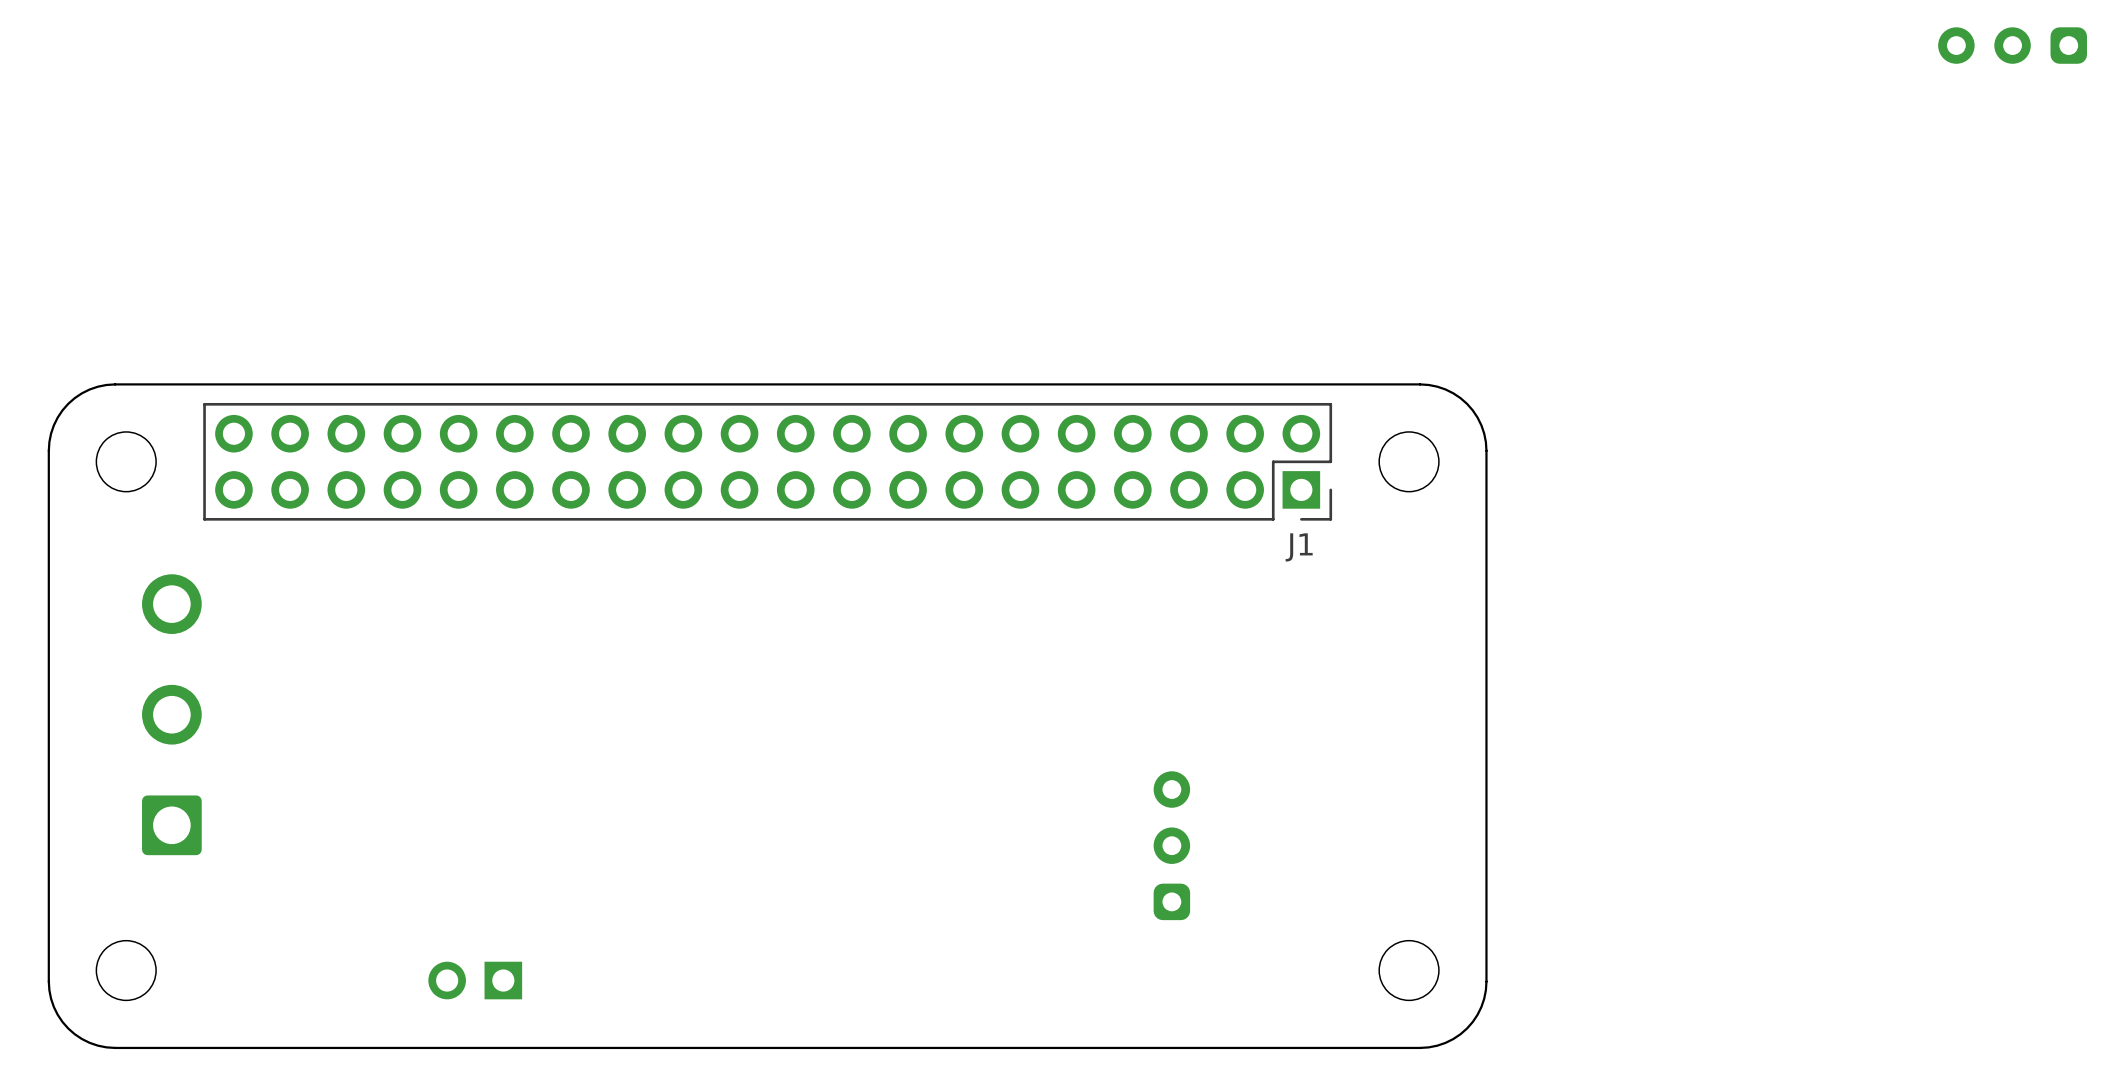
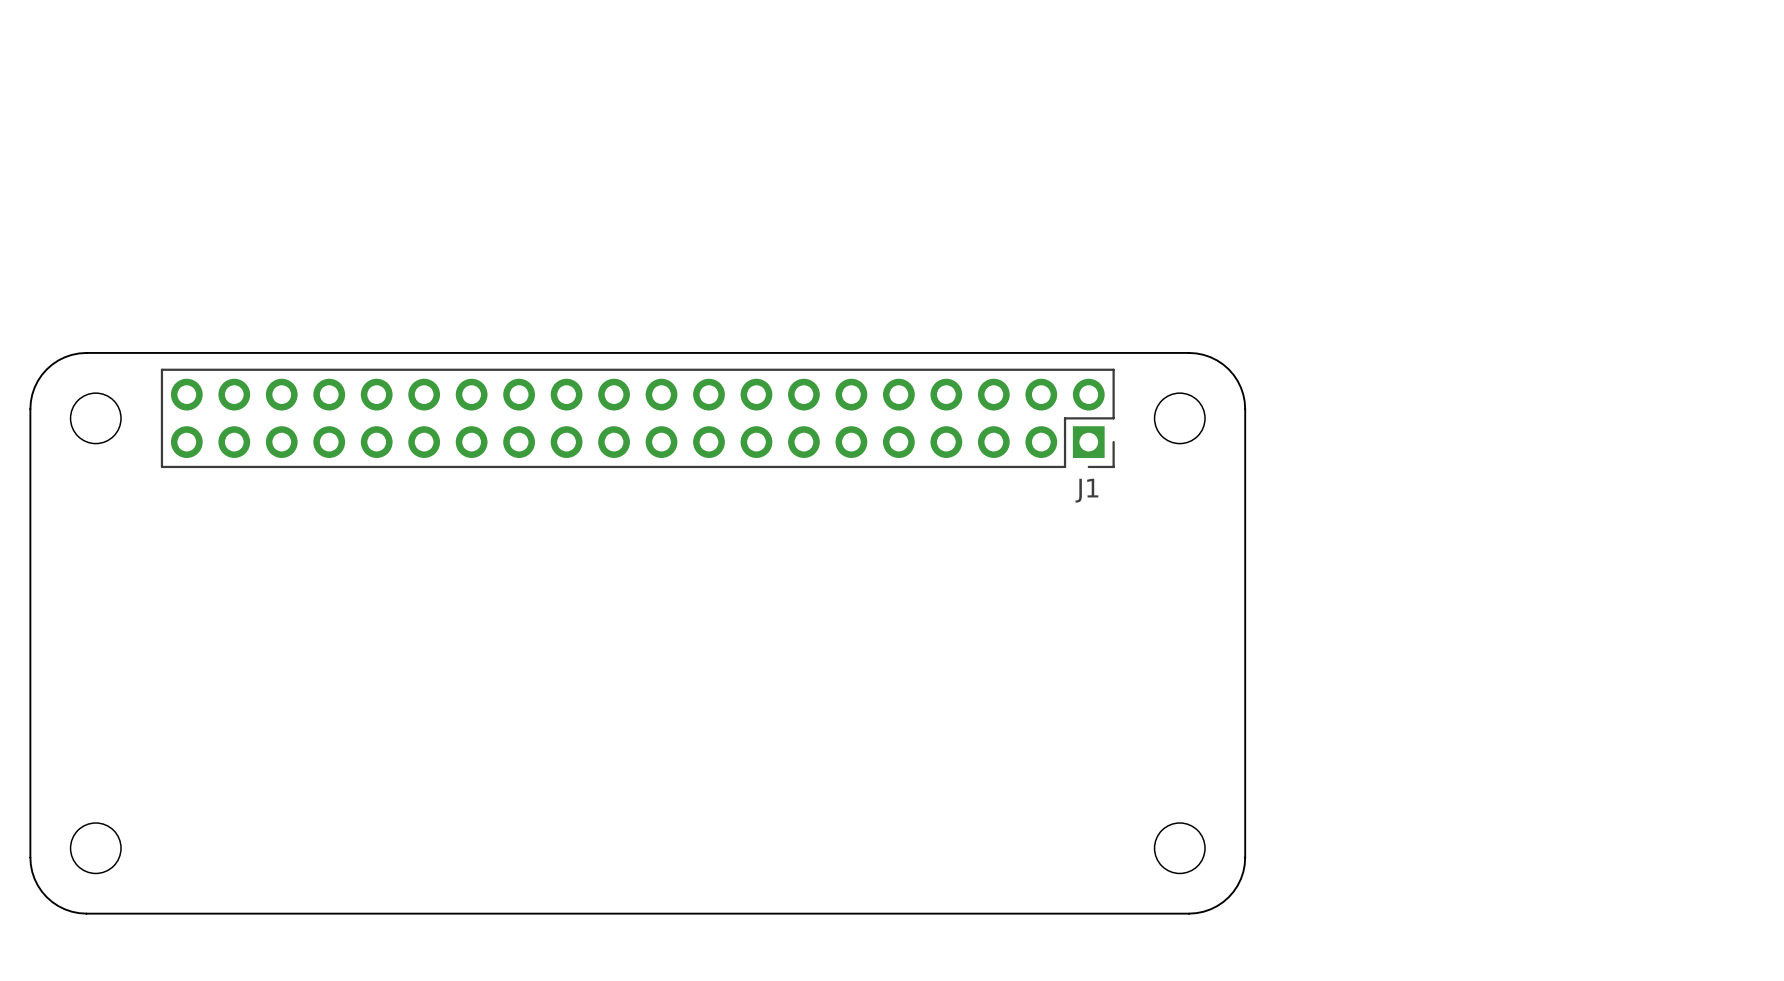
part: (2012, 45) -> none
part: (171, 714) -> none
part: (1171, 845) -> none
part: (475, 980) -> none

